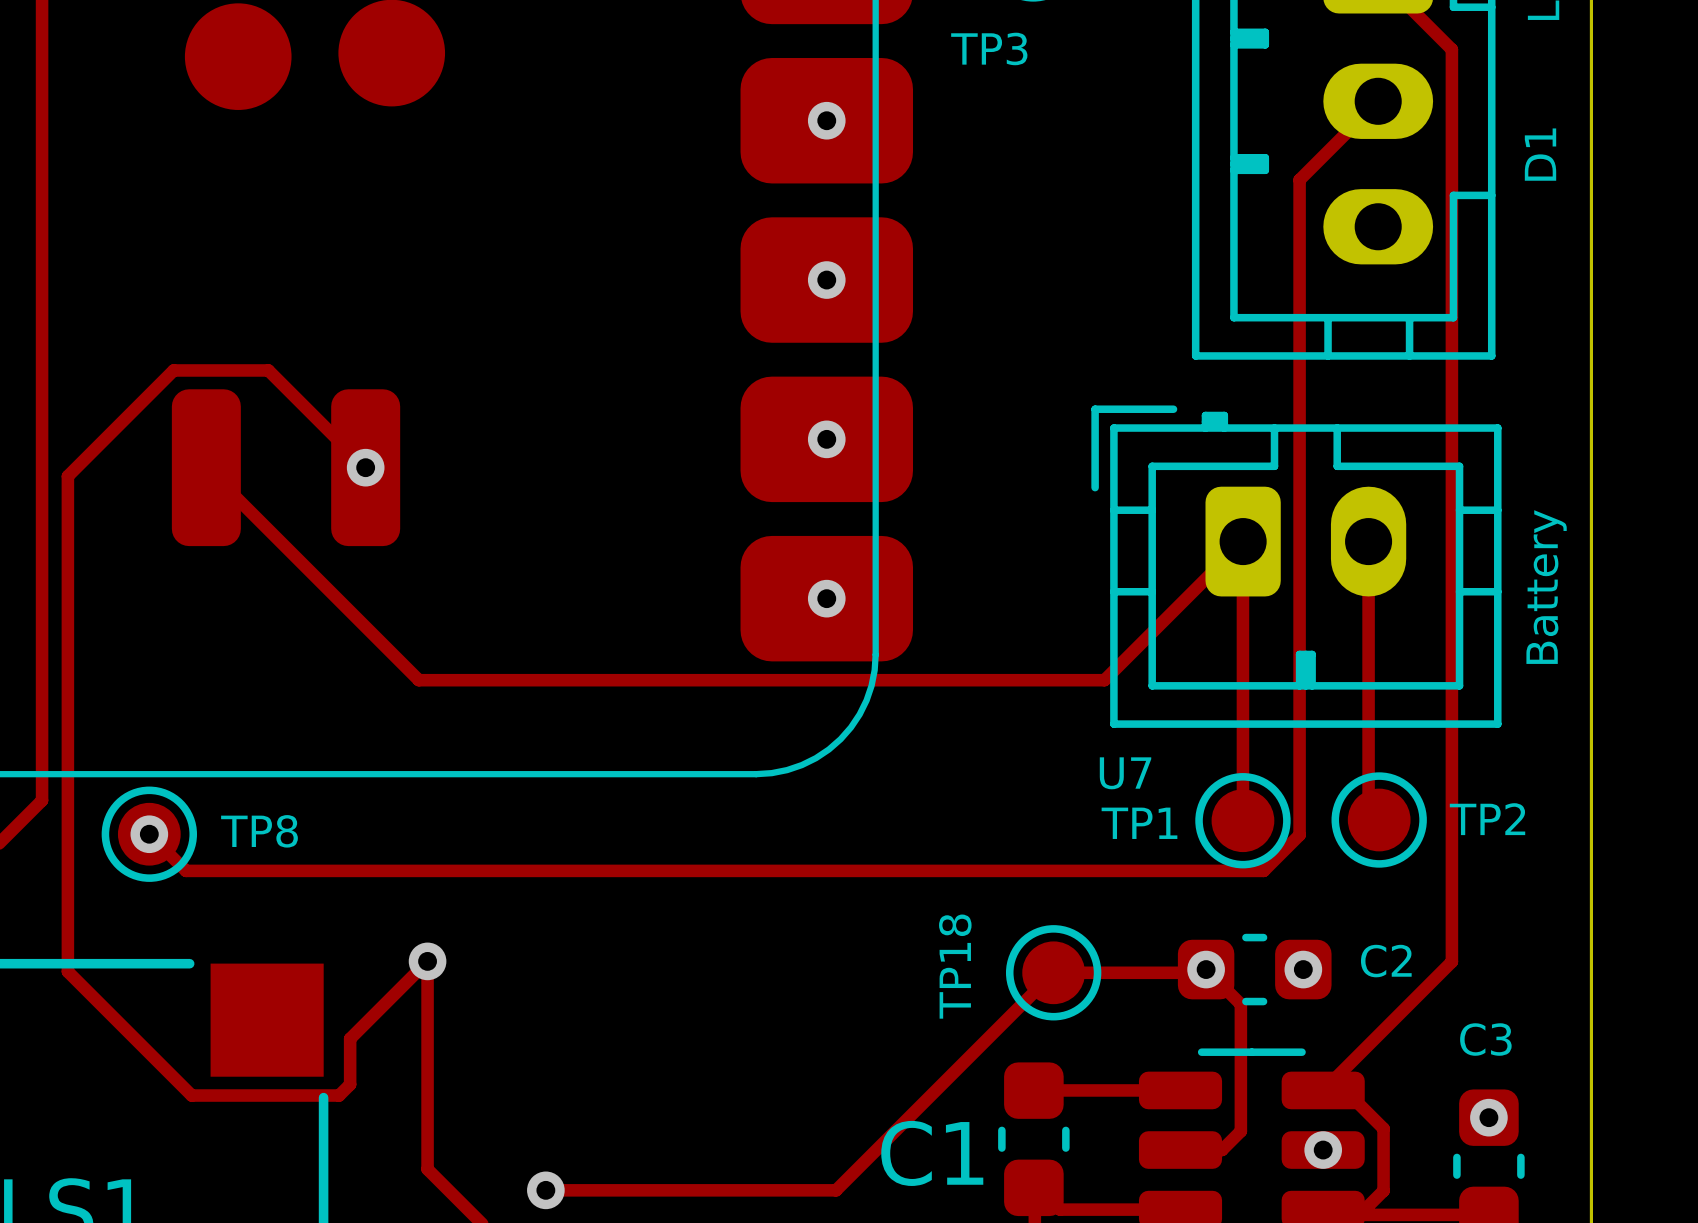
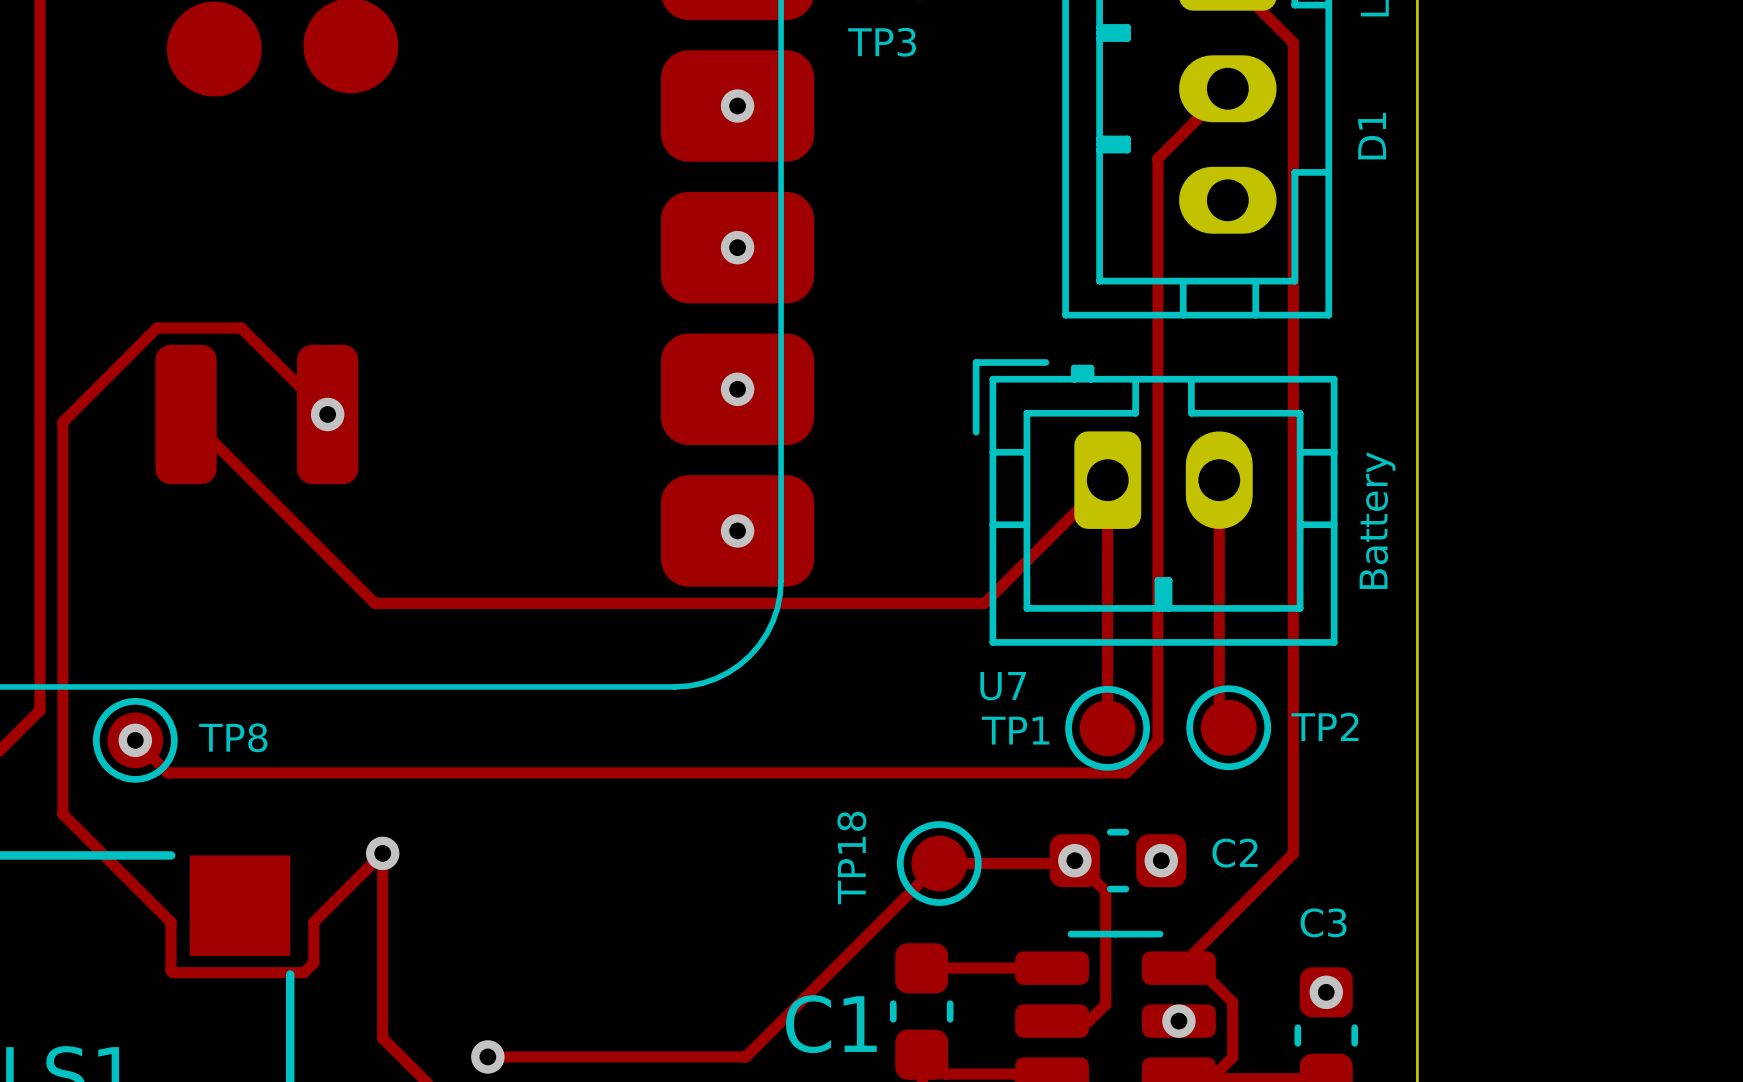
track: (67, 917) (67, 971) (189, 1093) -> (62, 814) (171, 922) (171, 970)

